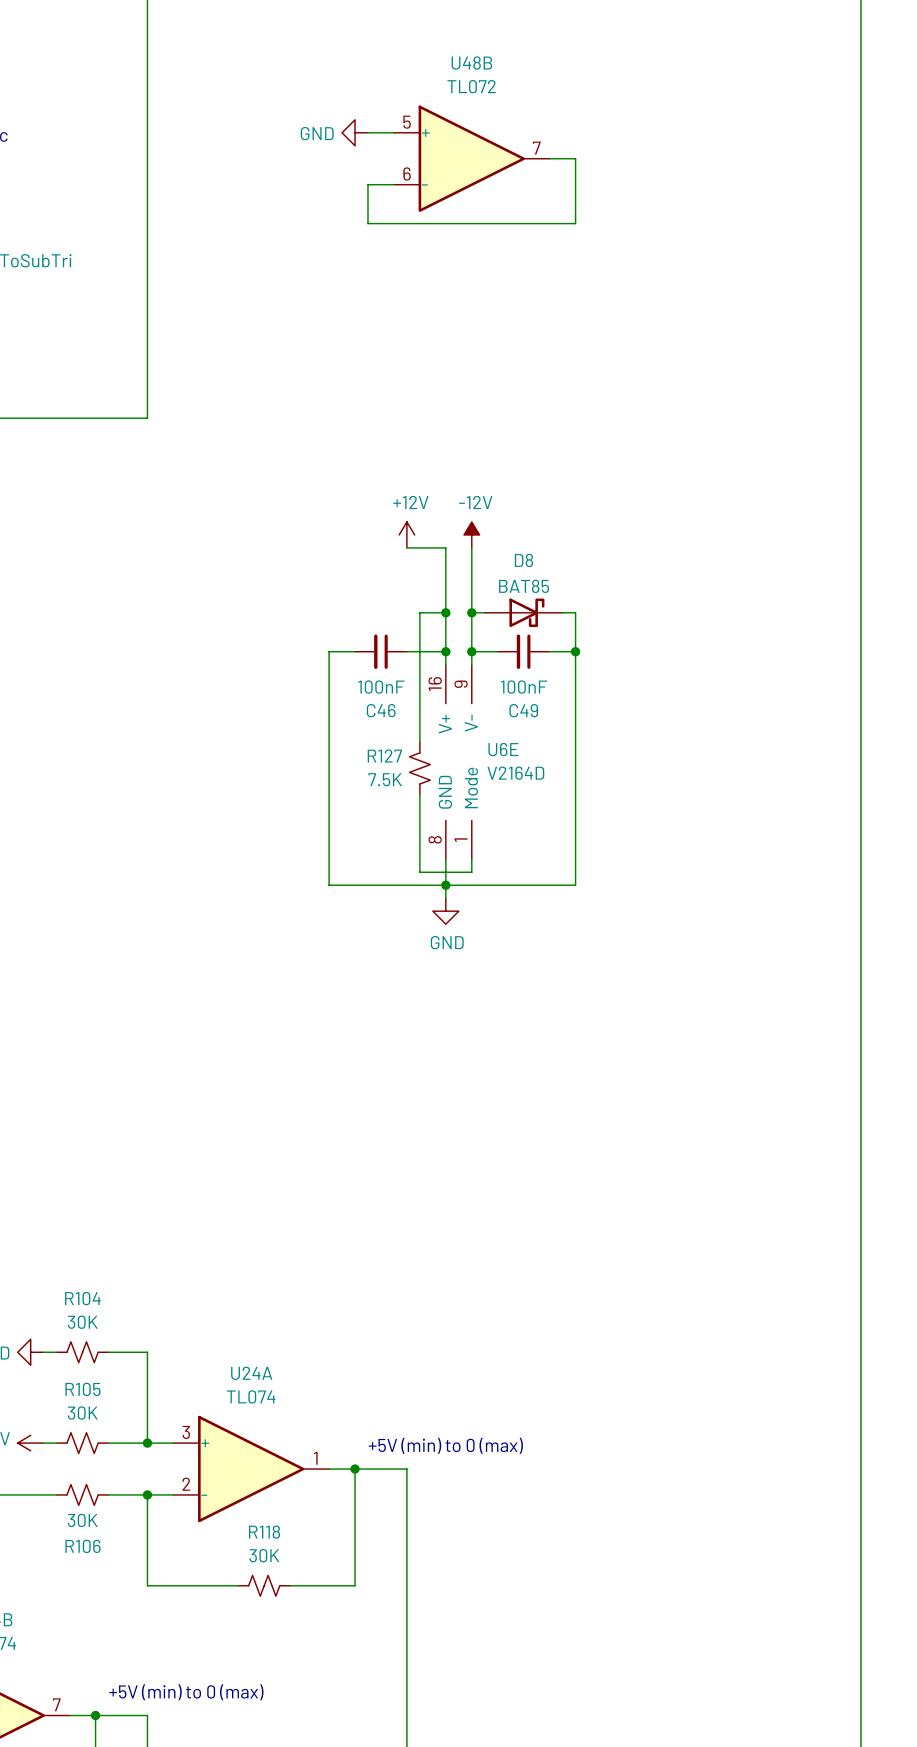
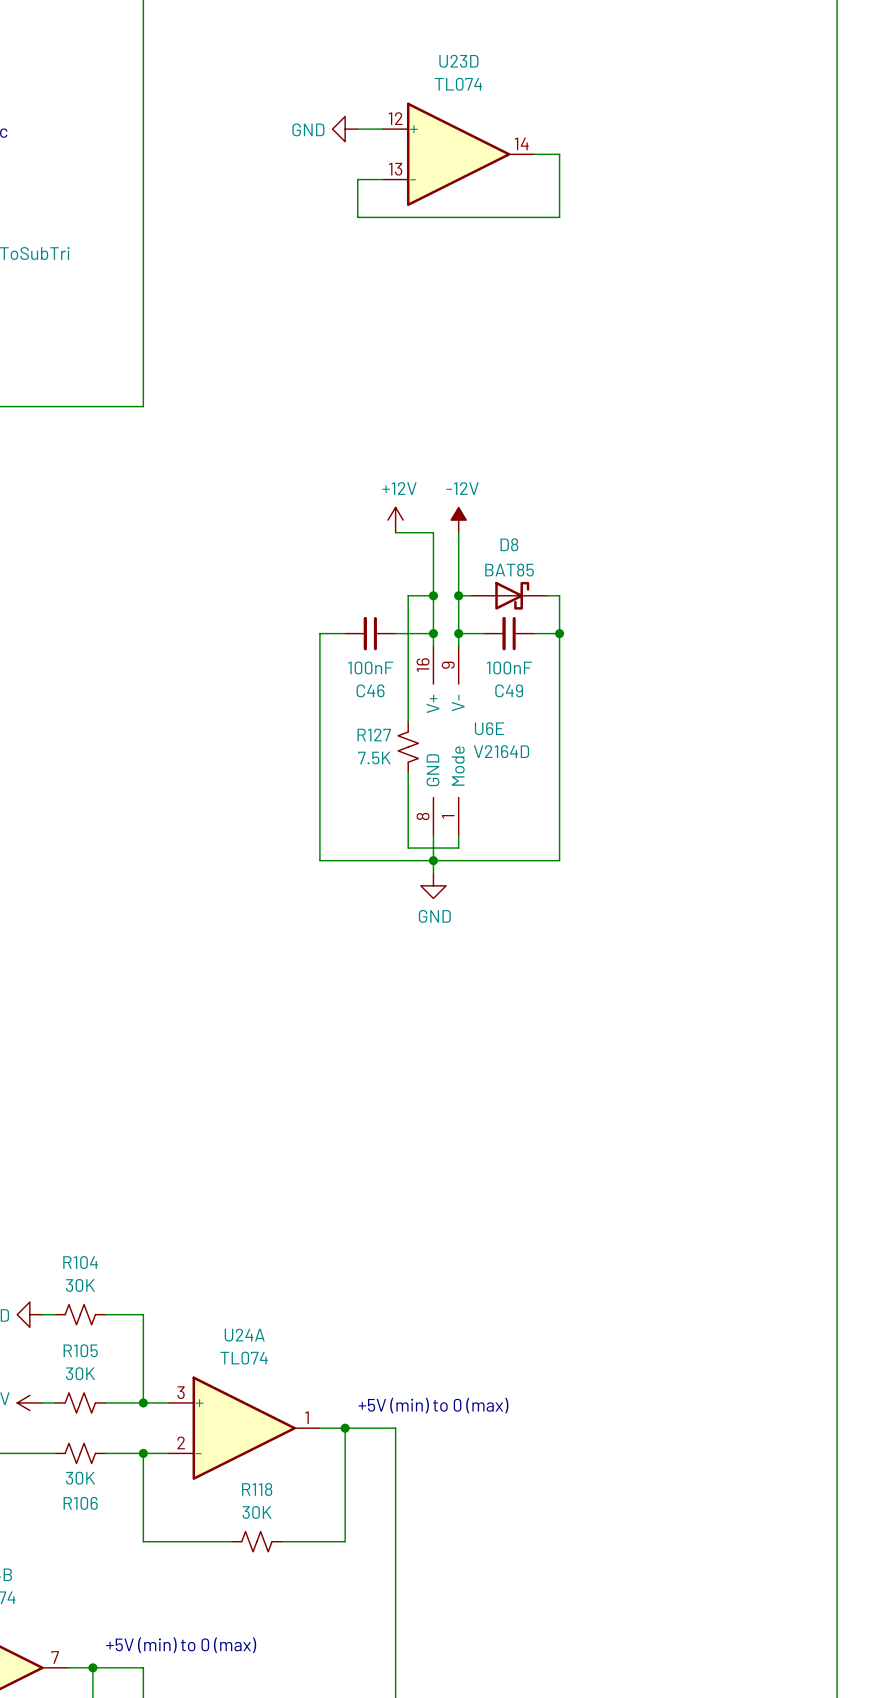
U48B name: U48B (471, 63) -> U23D (458, 61)
U48B value: TL072 (471, 86) -> TL074 (458, 84)
U48B pin number: 5 (407, 122) -> 12 (395, 118)
U48B pin number: 7 (536, 148) -> 14 (521, 143)
U48B pin number: 6 (407, 173) -> 13 (395, 169)

